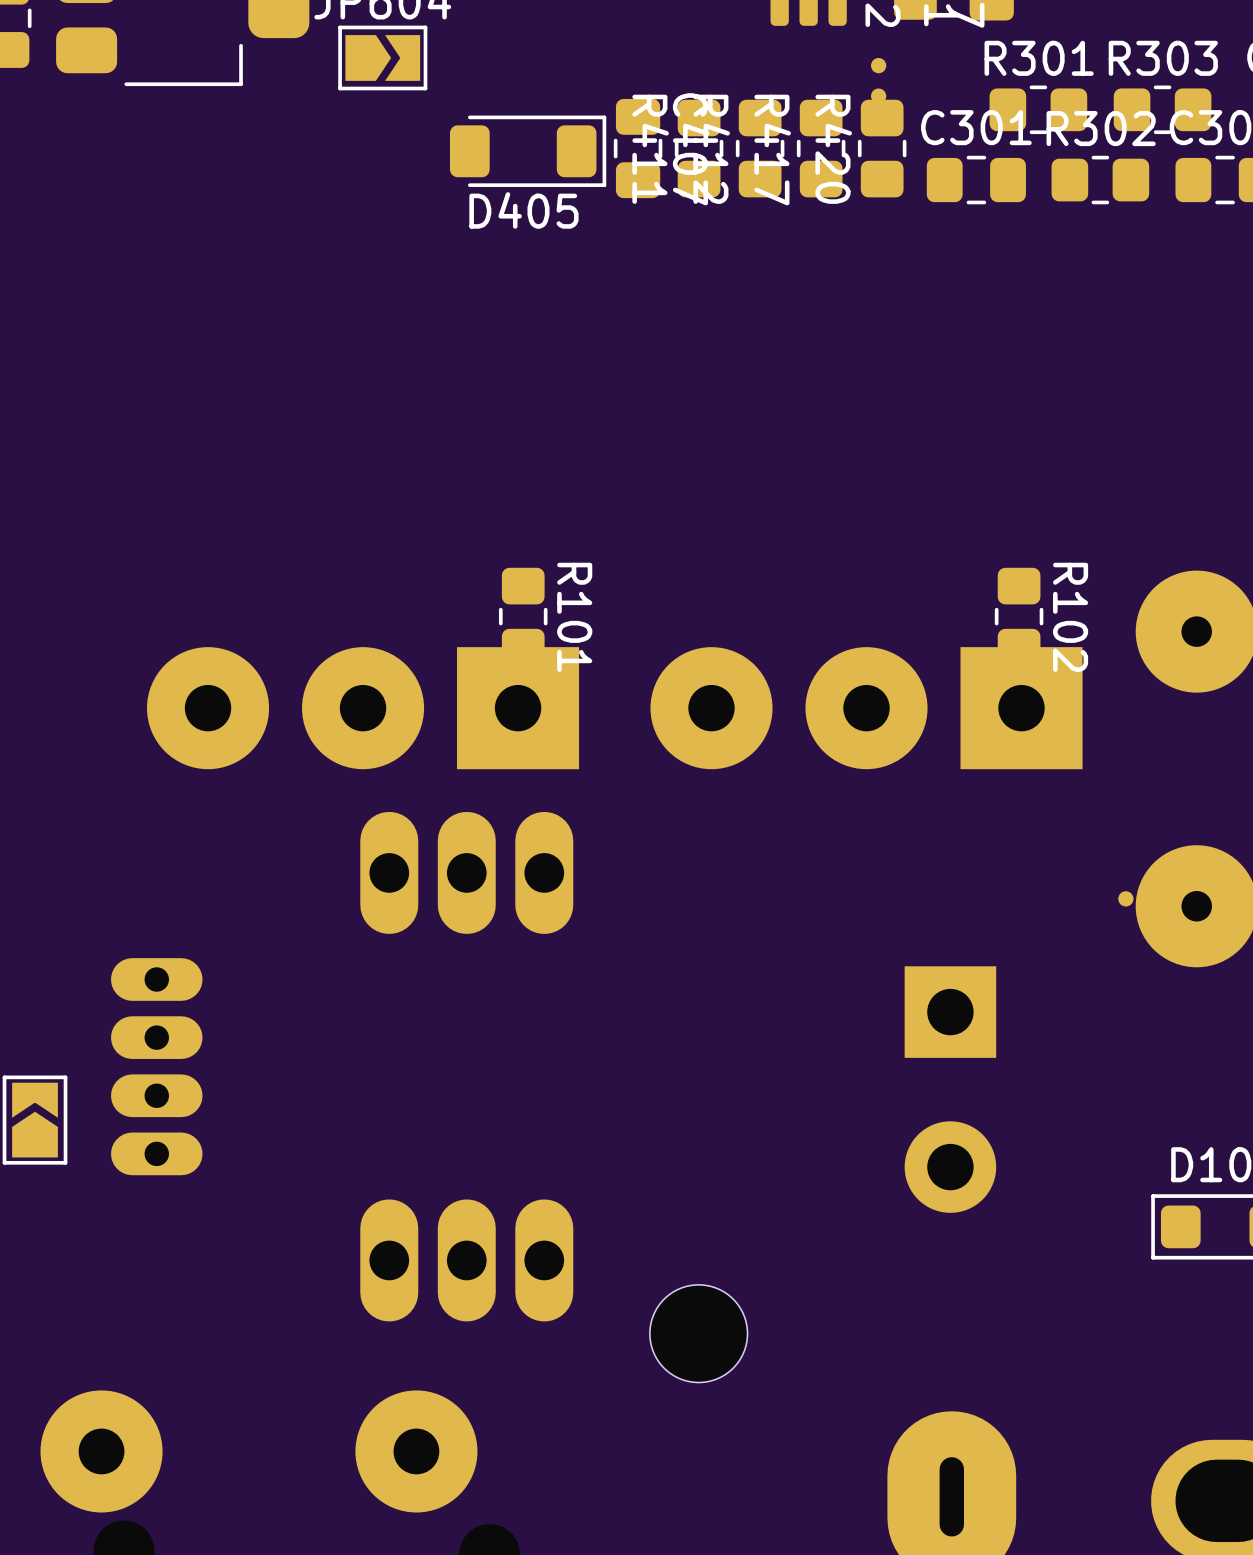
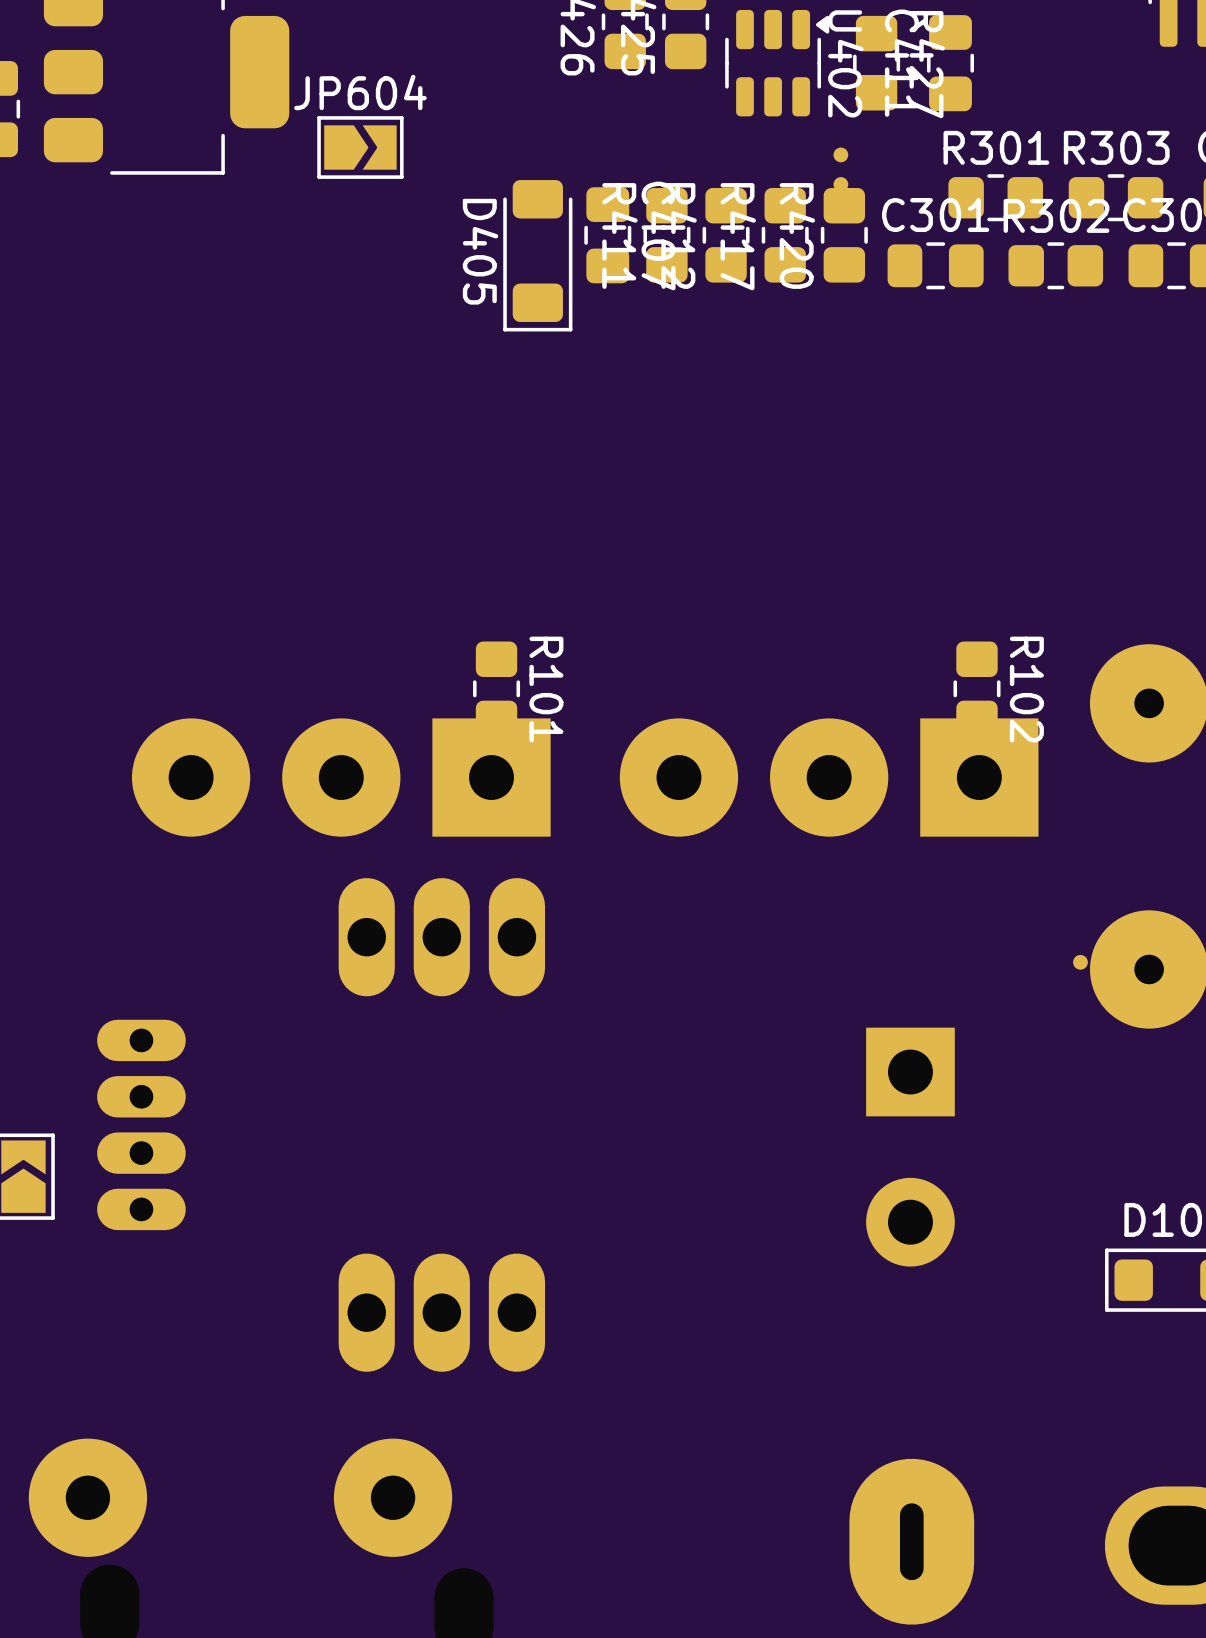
D405 rotation: 0° (528, 151) -> 90° clockwise (537, 255)
part: (698, 1333) -> none

